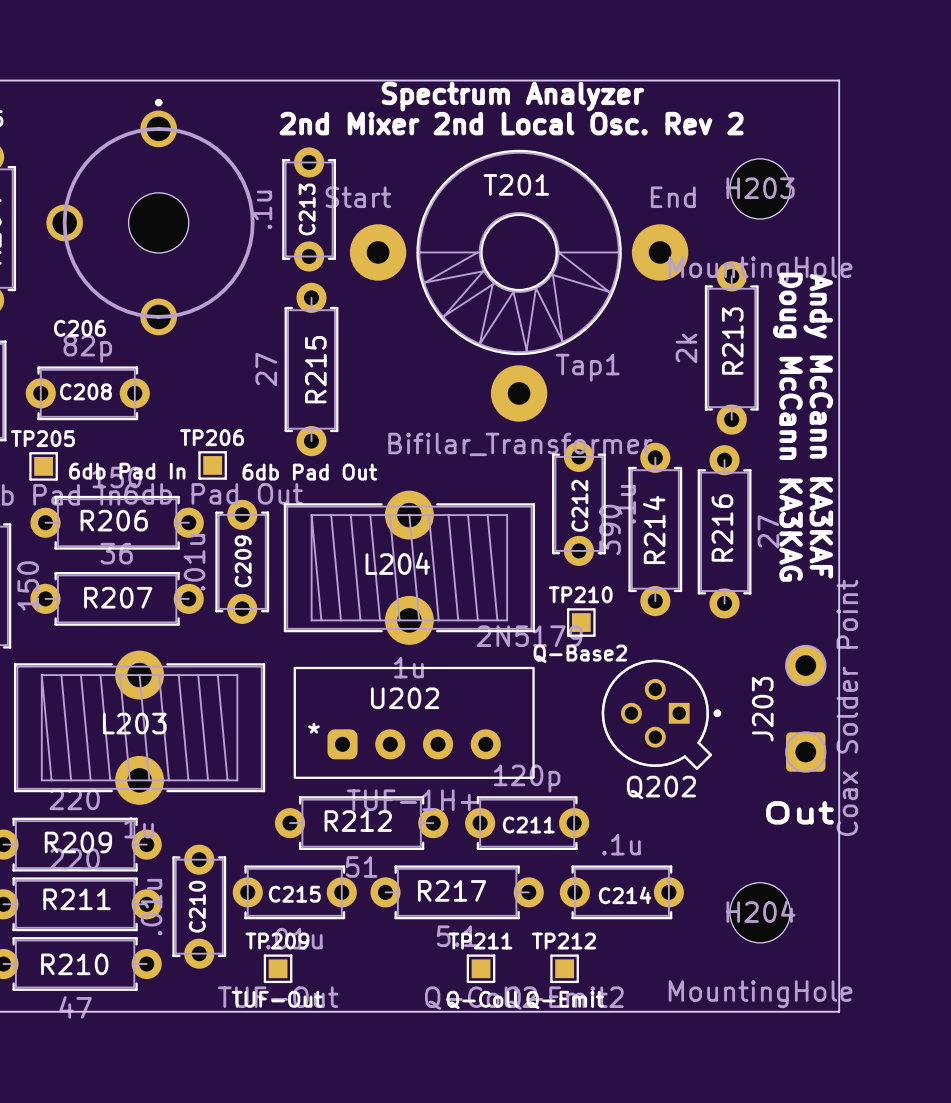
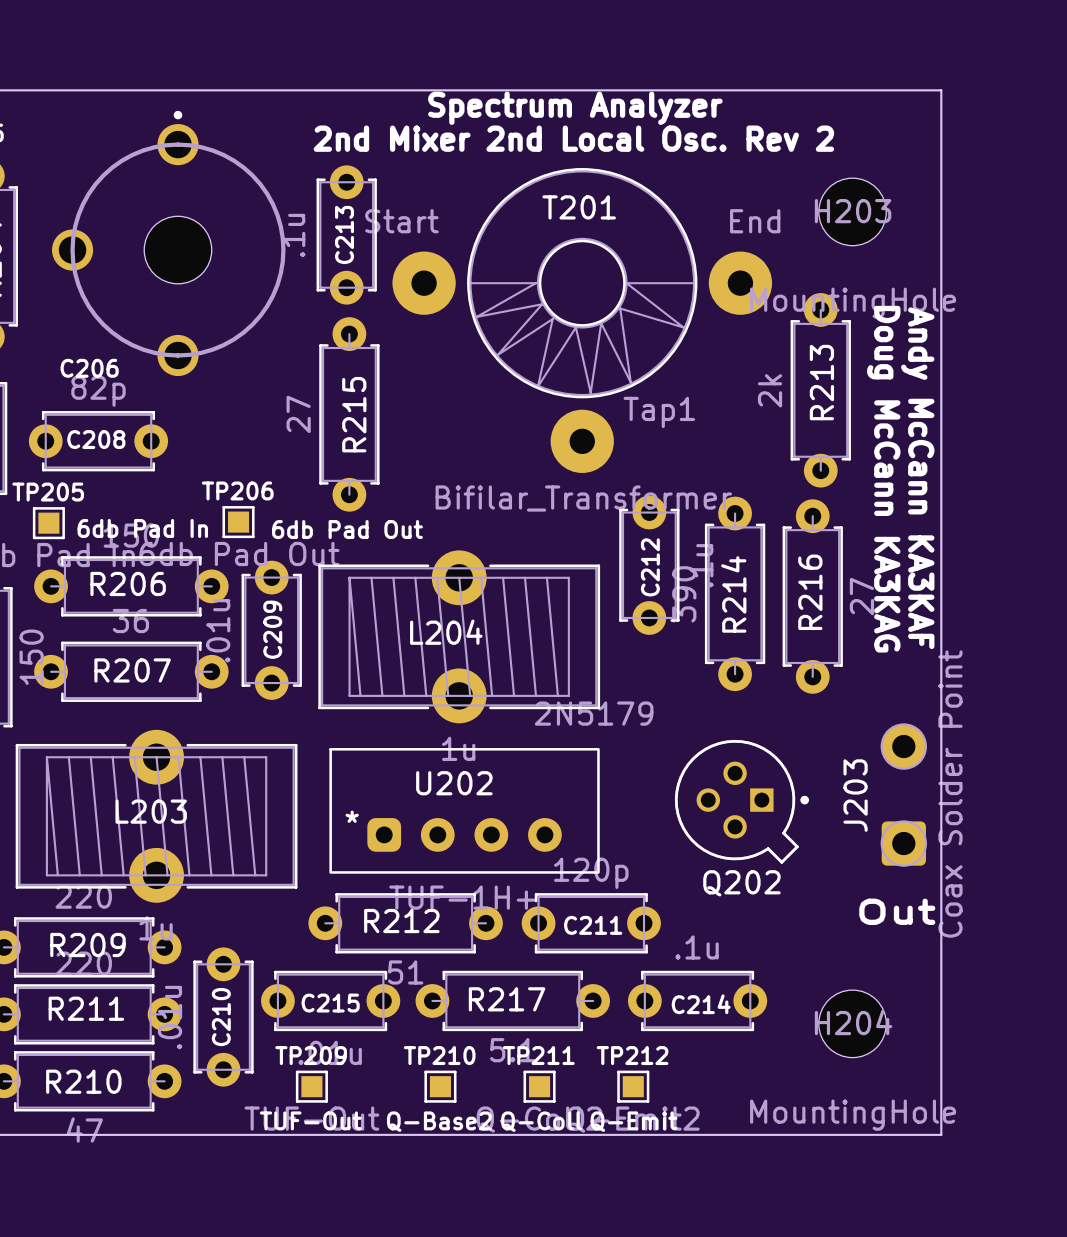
TP210 position: (581, 622) -> (440, 1086)

